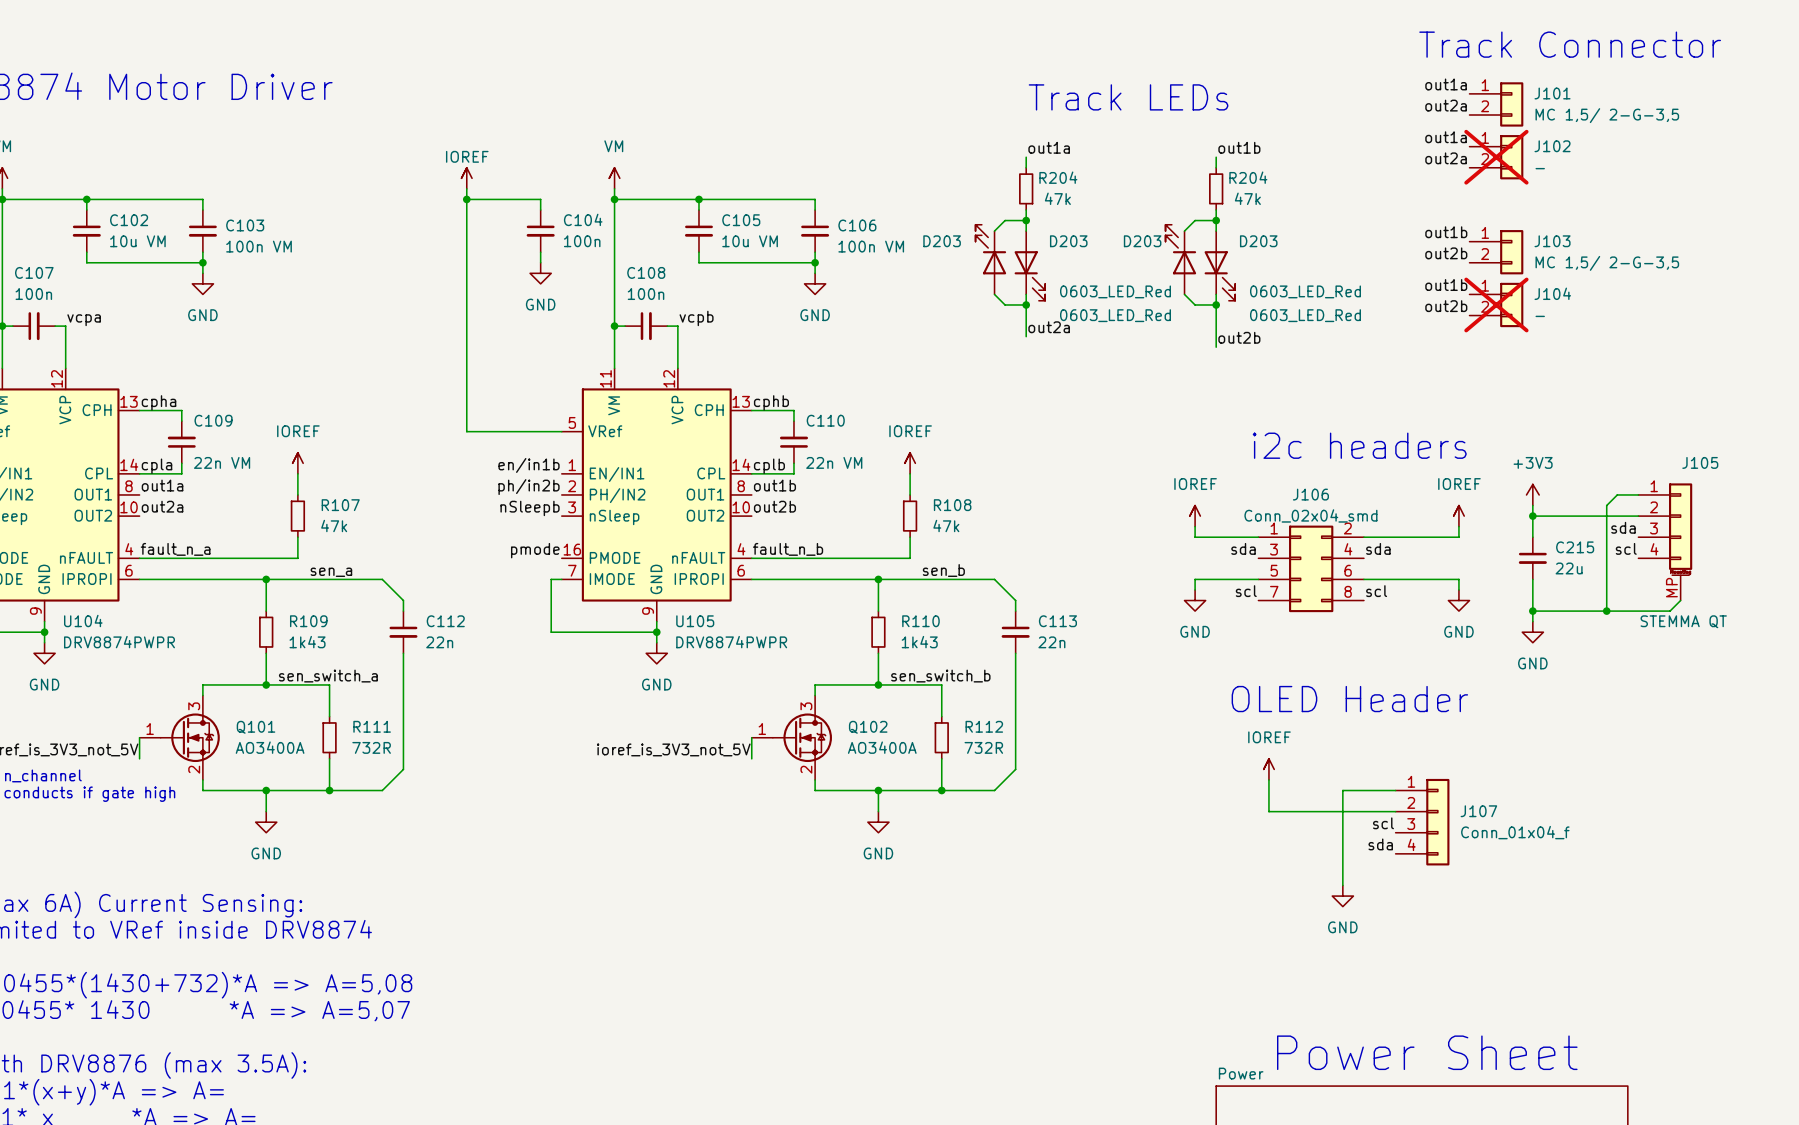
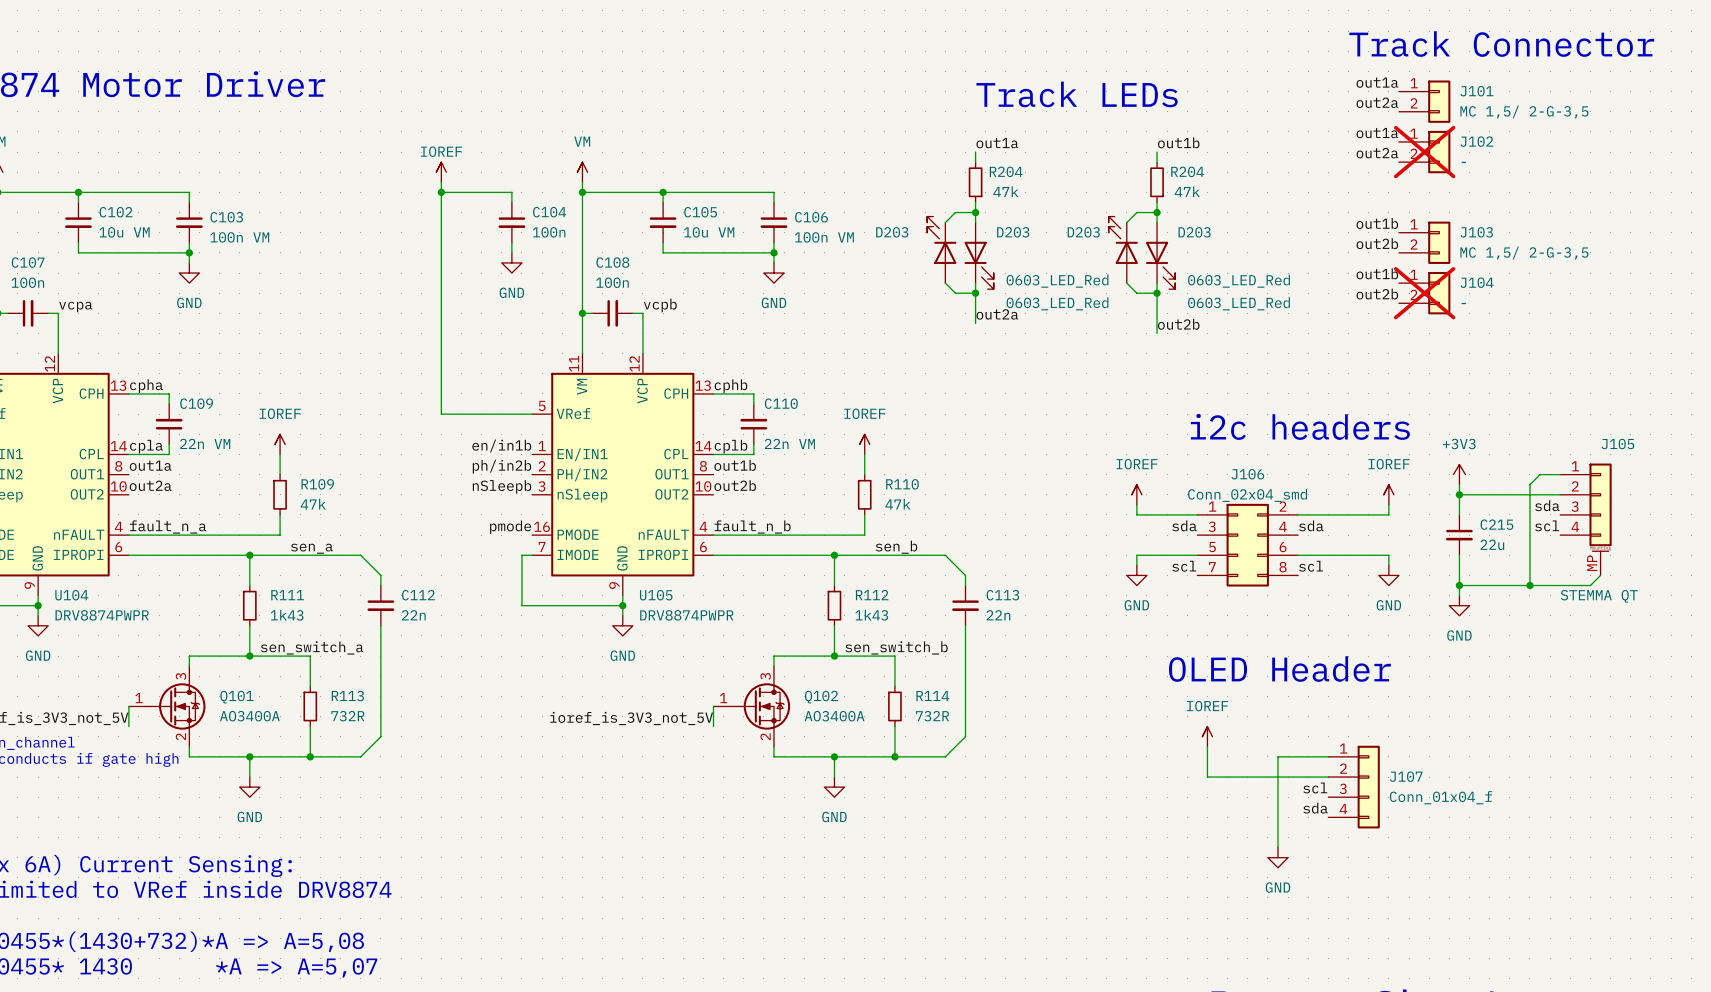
R107 name: R107 (340, 505) -> R109 (317, 484)
R108 name: R108 (952, 505) -> R110 (902, 484)
R109 name: R109 (308, 621) -> R111 (287, 595)
R110 name: R110 (920, 621) -> R112 (872, 595)
R111 name: R111 (372, 726) -> R113 (347, 696)
R112 name: R112 (984, 726) -> R114 (932, 696)

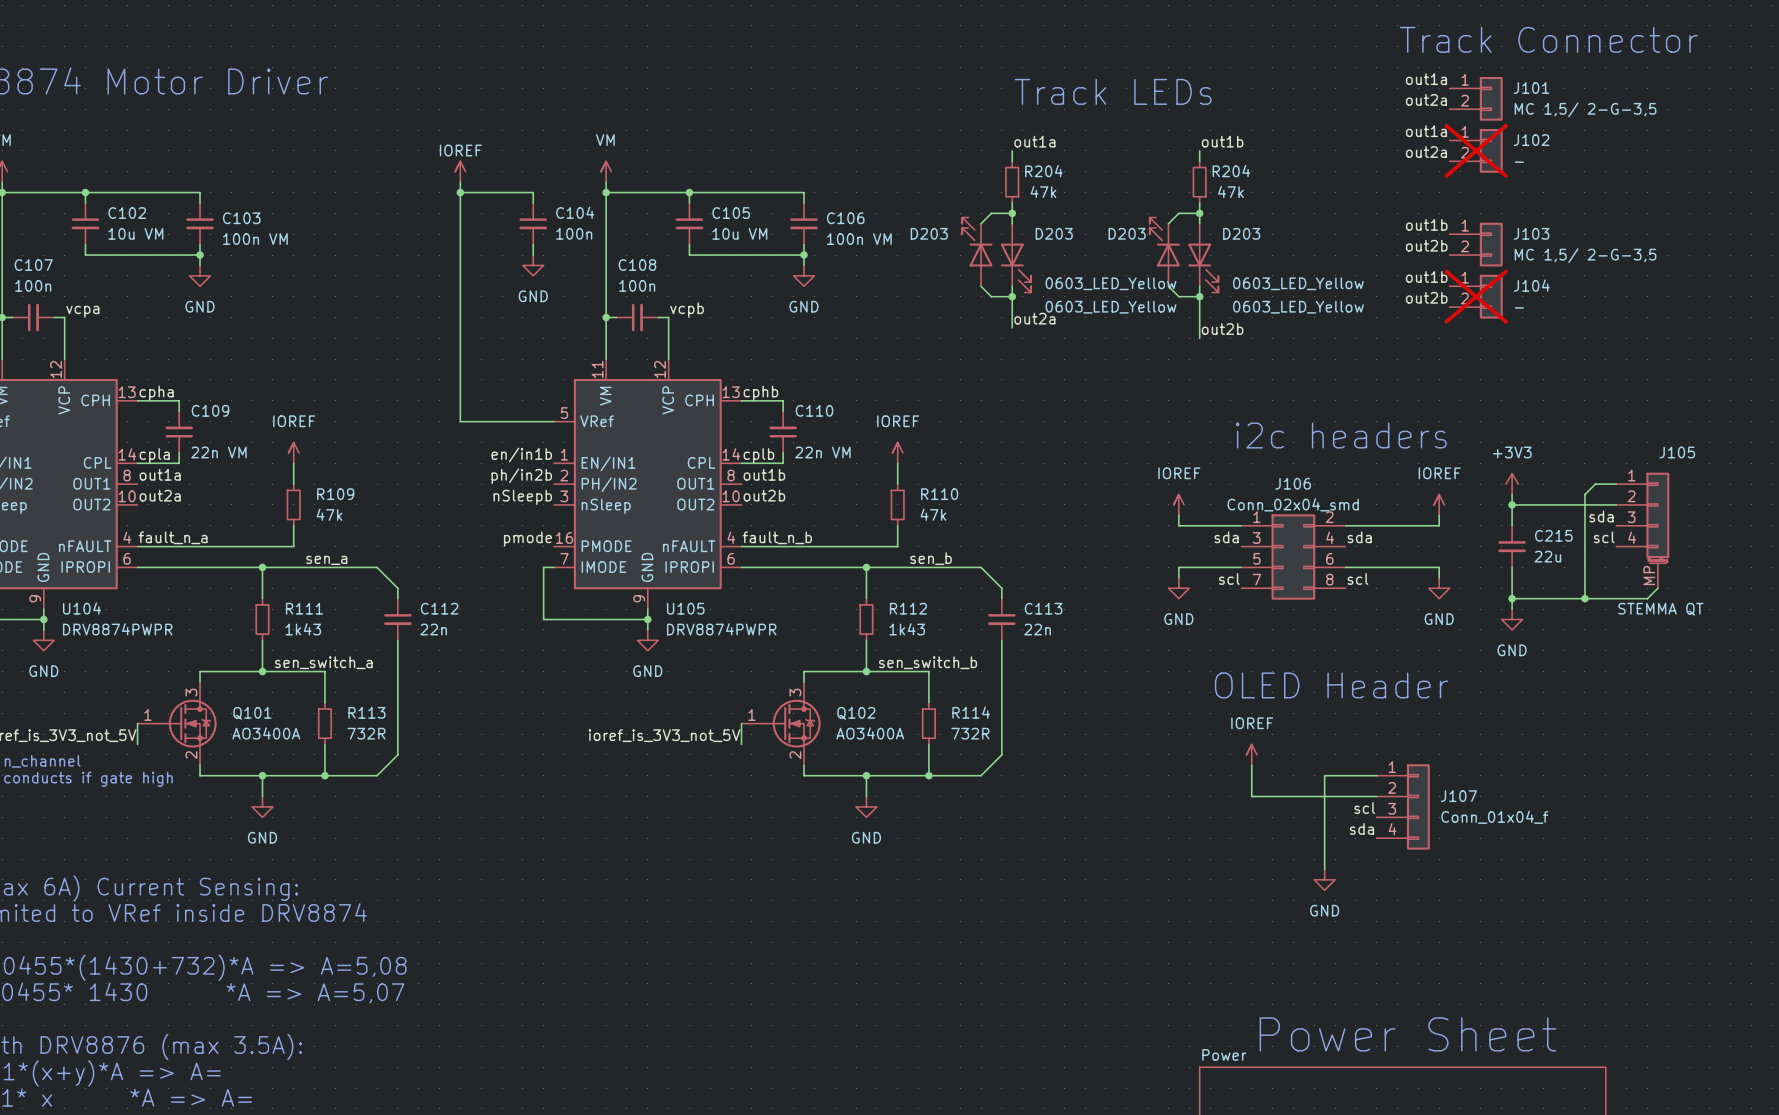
D203 value: 0603_LED_Red (1057, 281) -> 0603_LED_Yellow (1111, 283)
D203 value: 0603_LED_Red (1238, 281) -> 0603_LED_Yellow (1298, 283)
D203 value: 0603_LED_Red (1057, 303) -> 0603_LED_Yellow (1111, 307)
D203 value: 0603_LED_Red (1238, 303) -> 0603_LED_Yellow (1298, 307)

